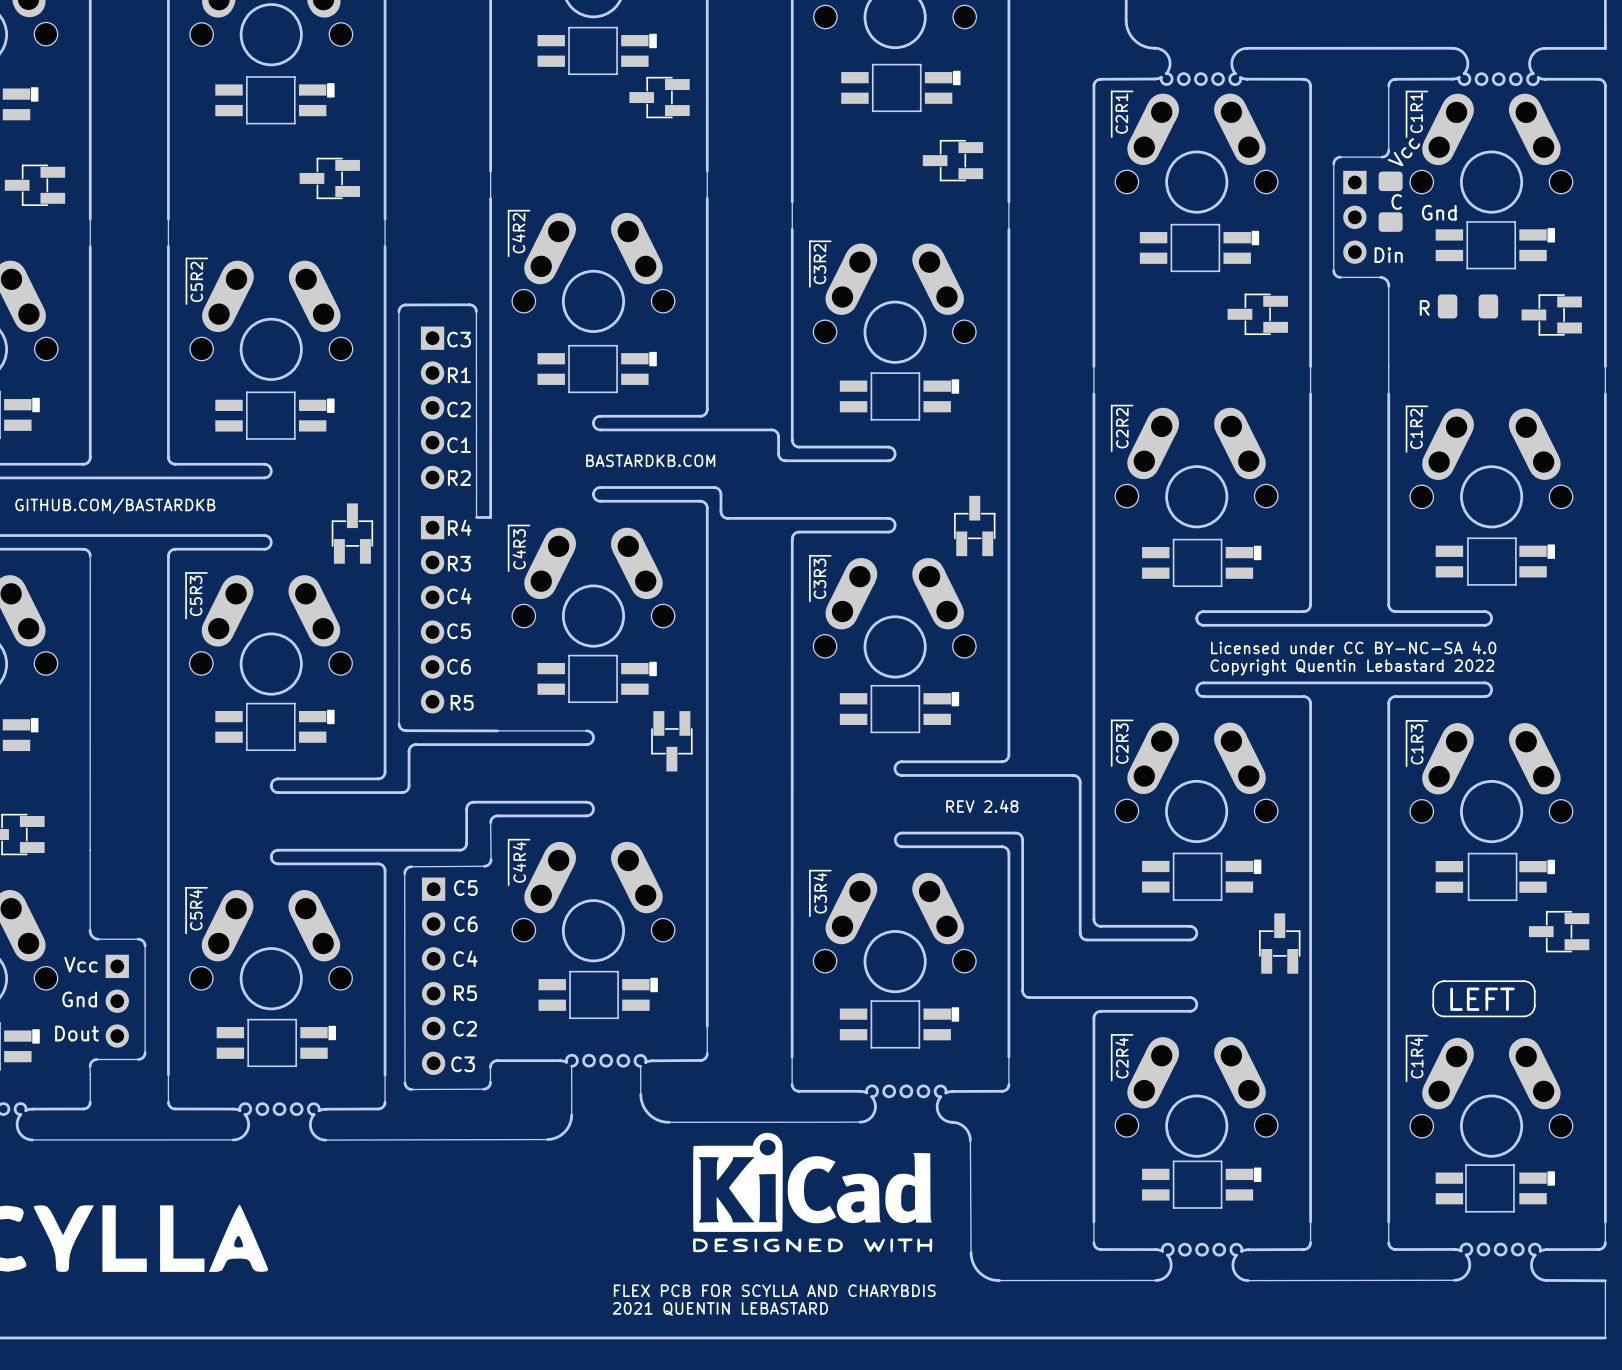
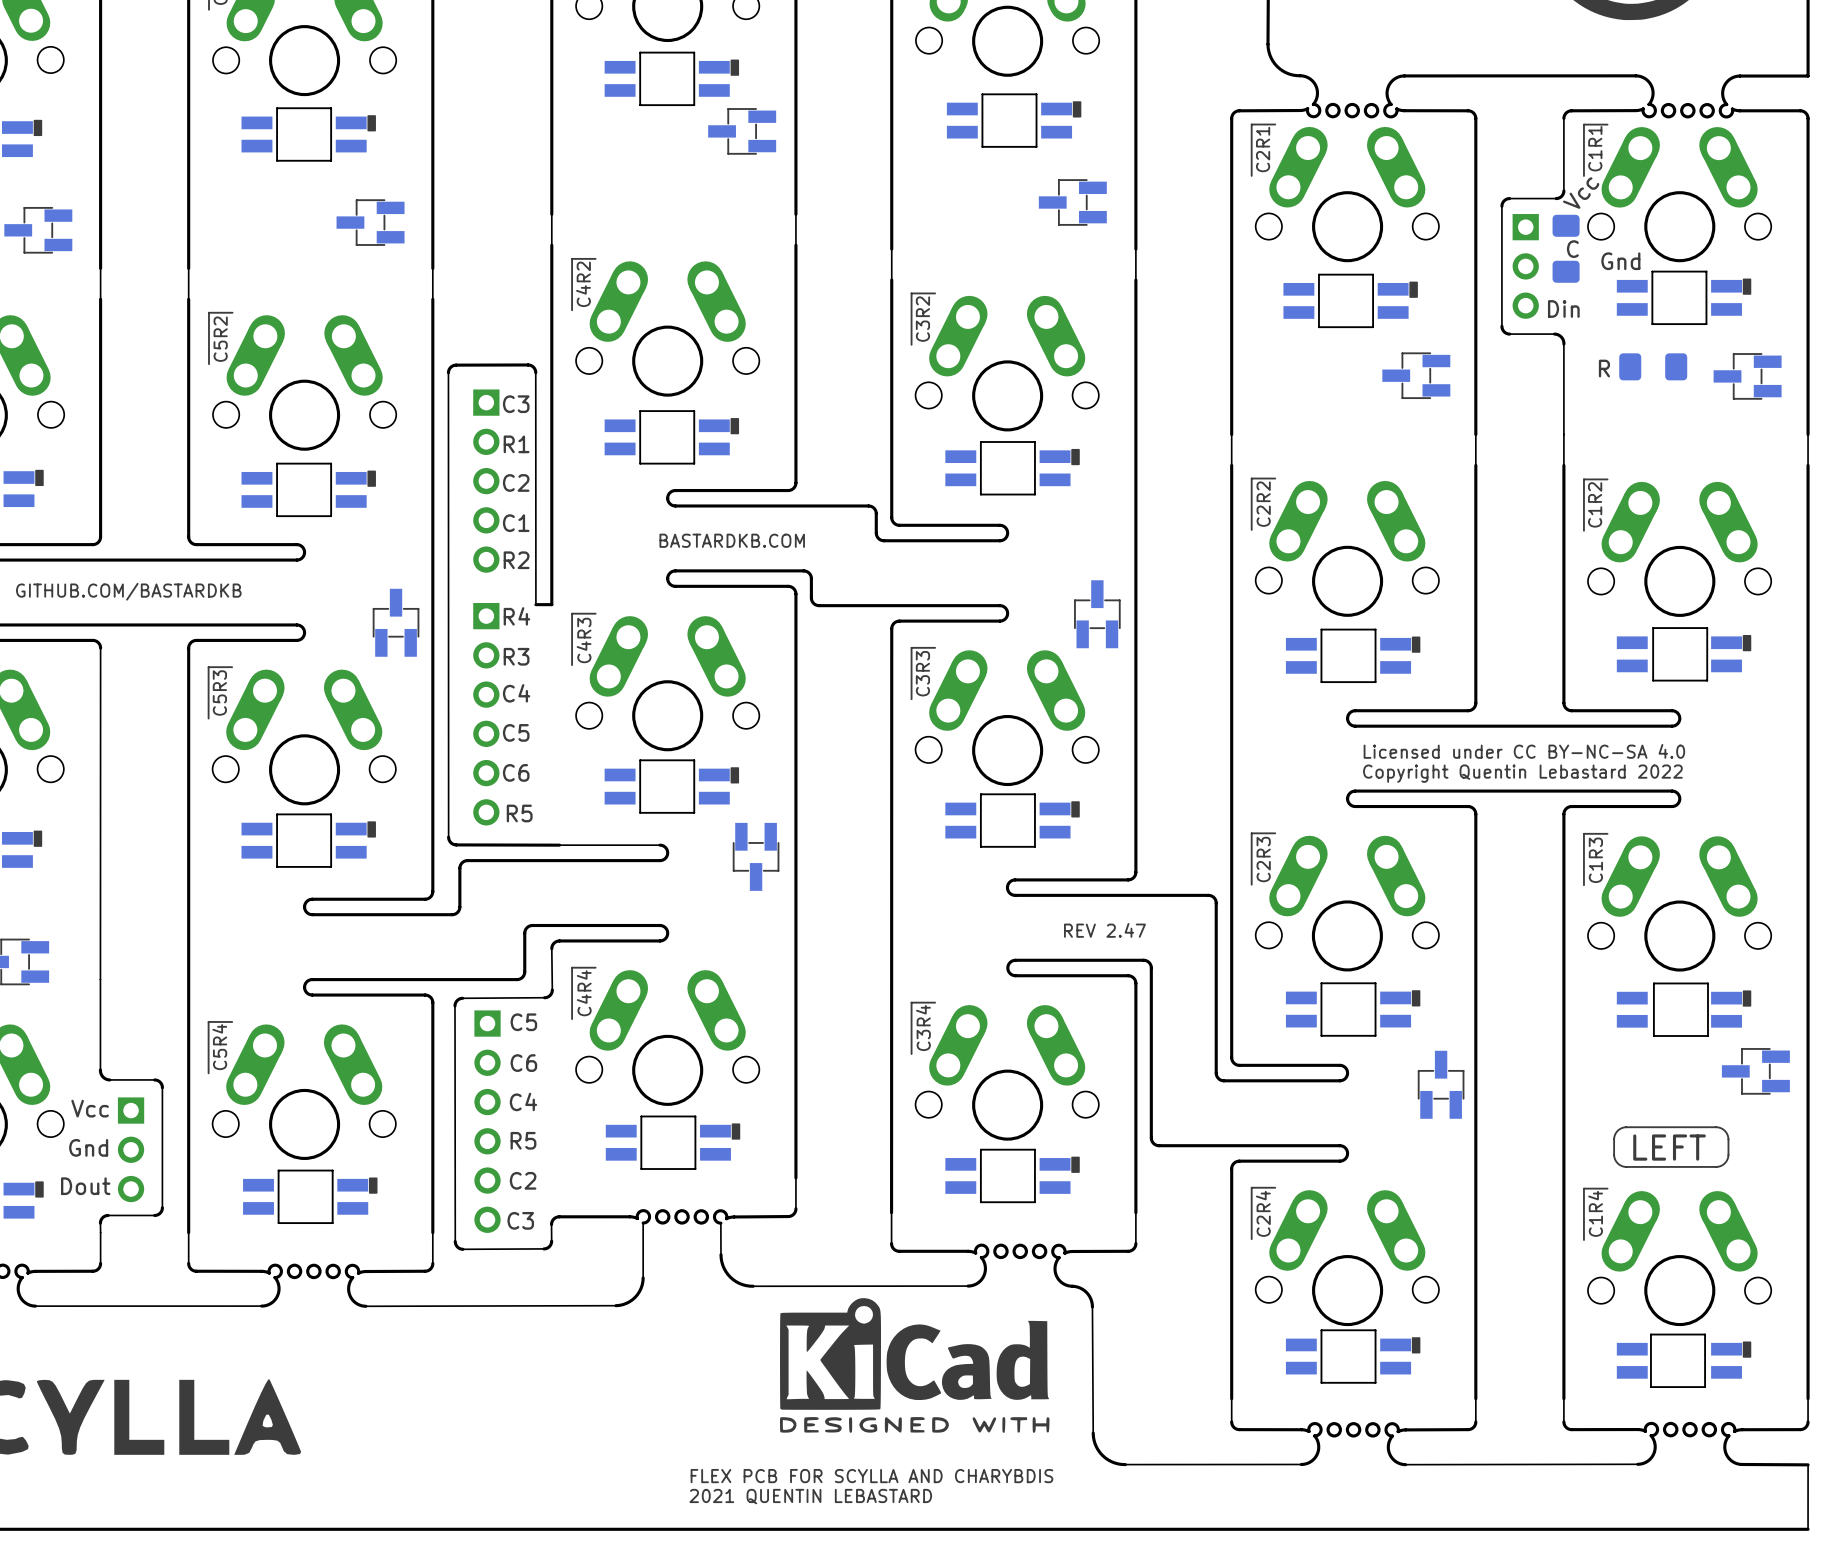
text: REV 2.48 (982, 806) -> REV 2.47 (1104, 930)

